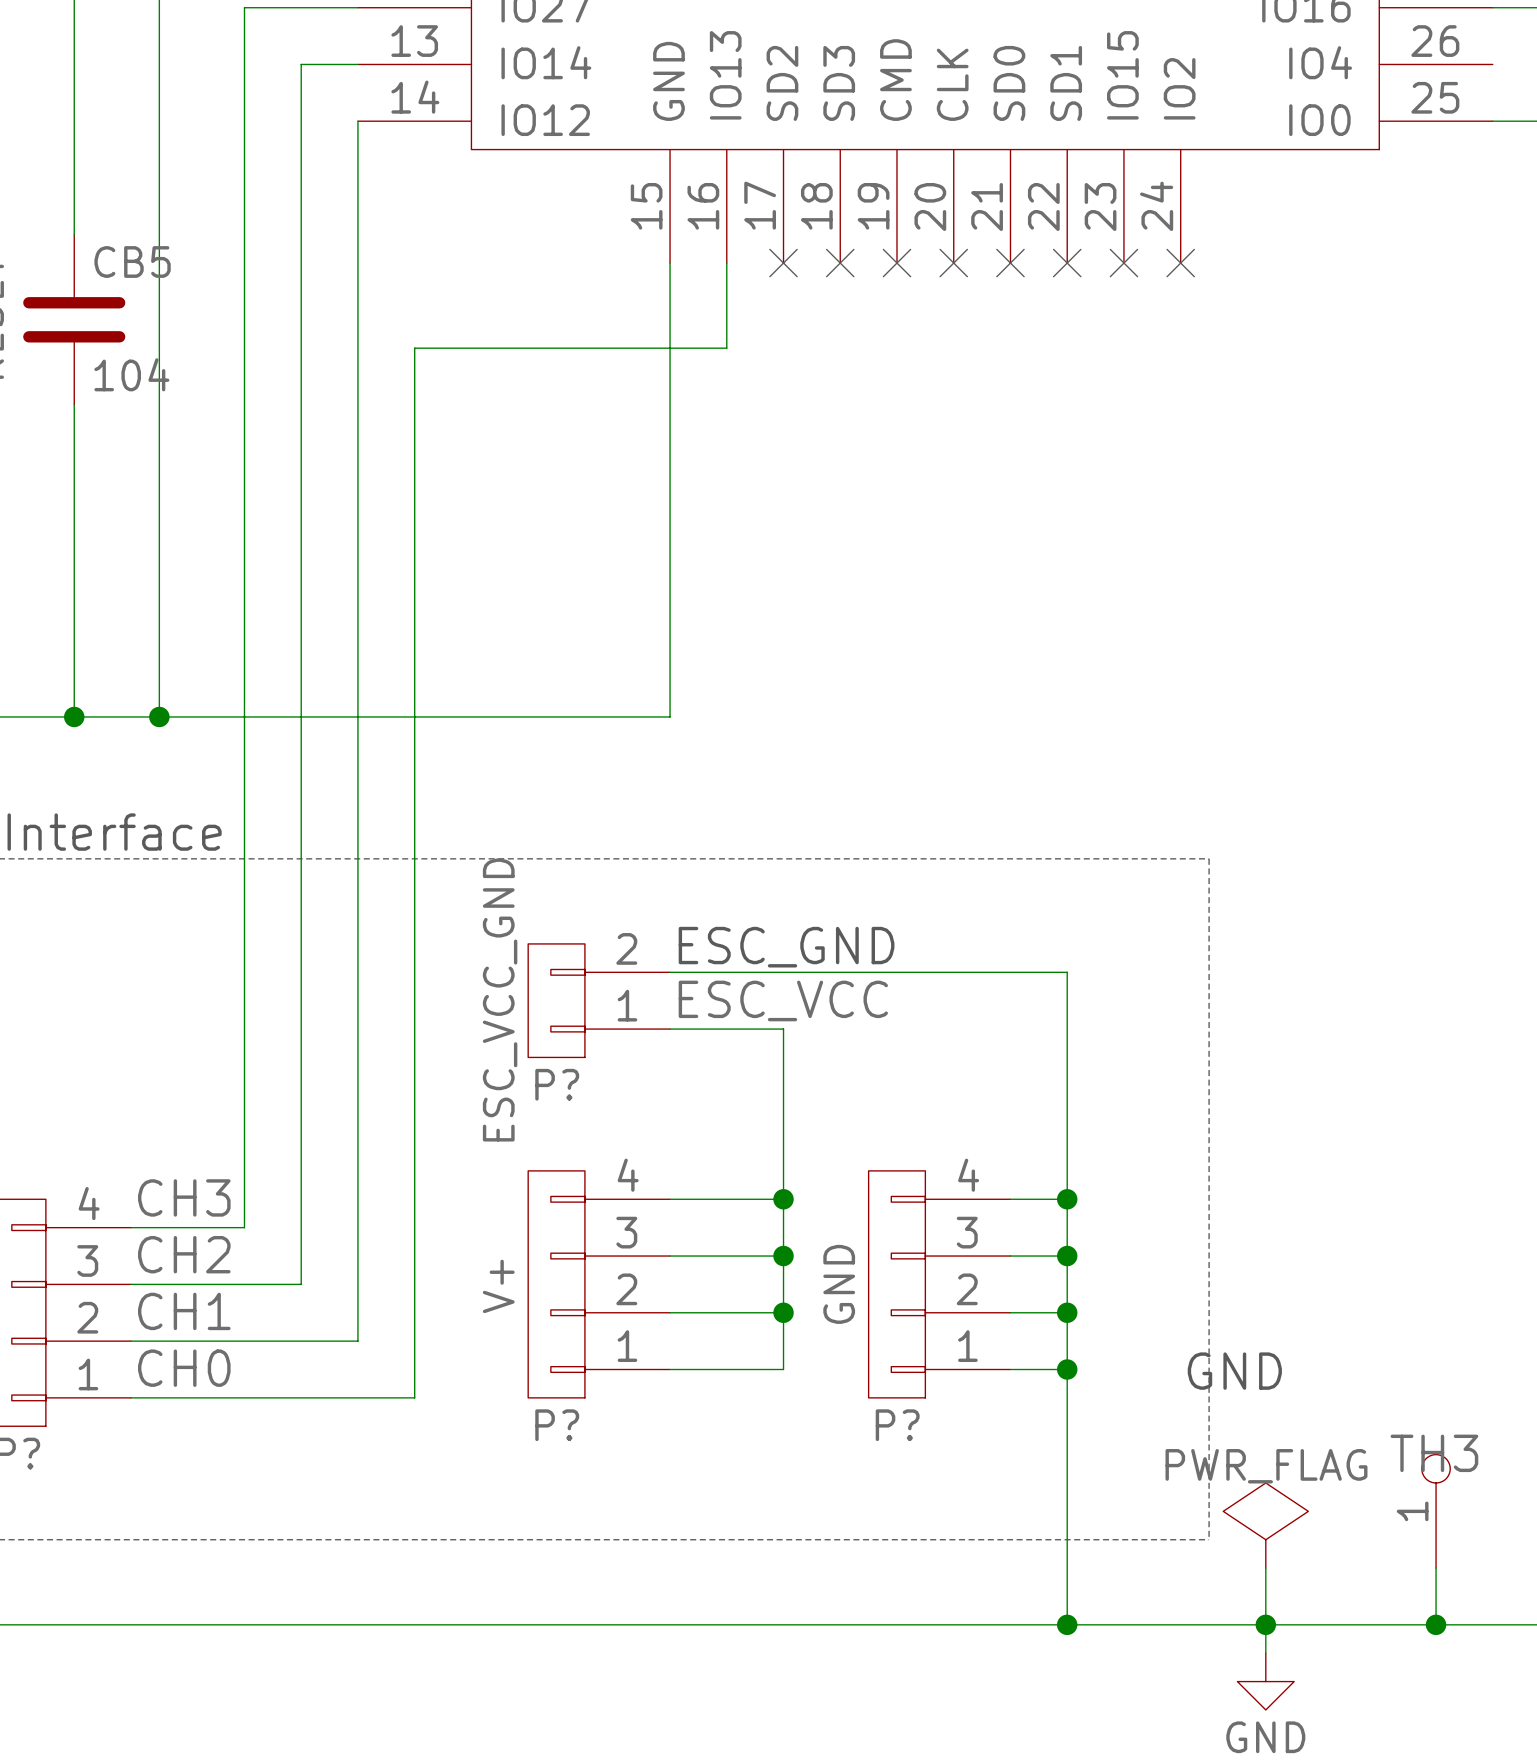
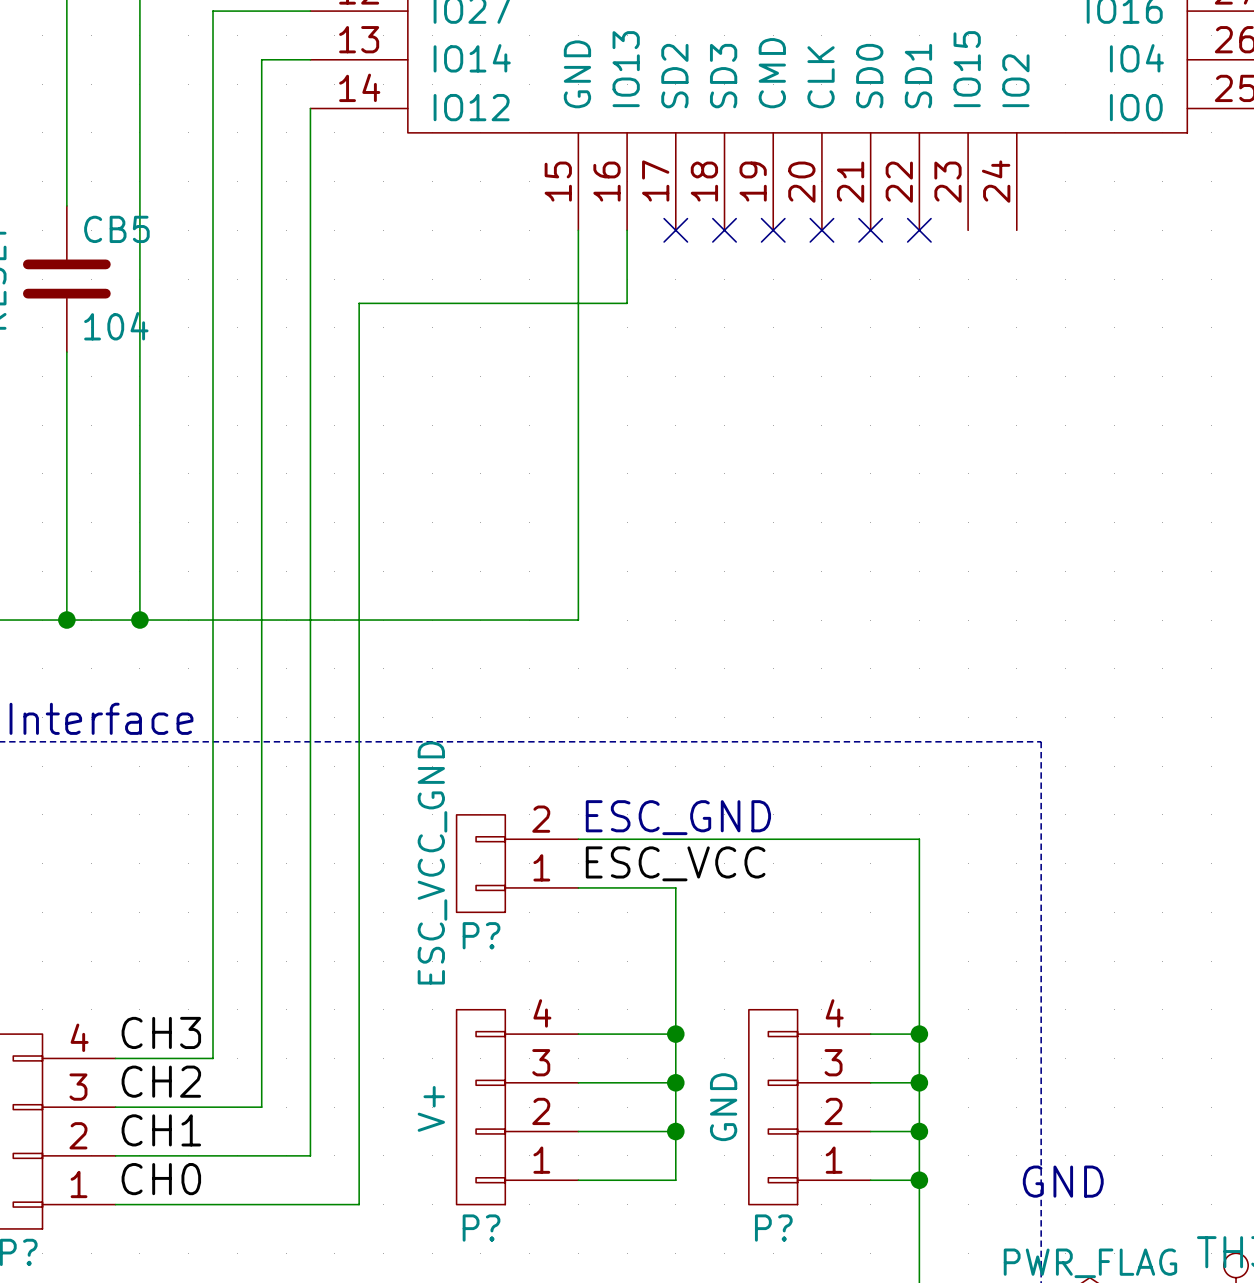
no-connect mark: (1123, 263) -> none
no-connect mark: (1180, 263) -> none

